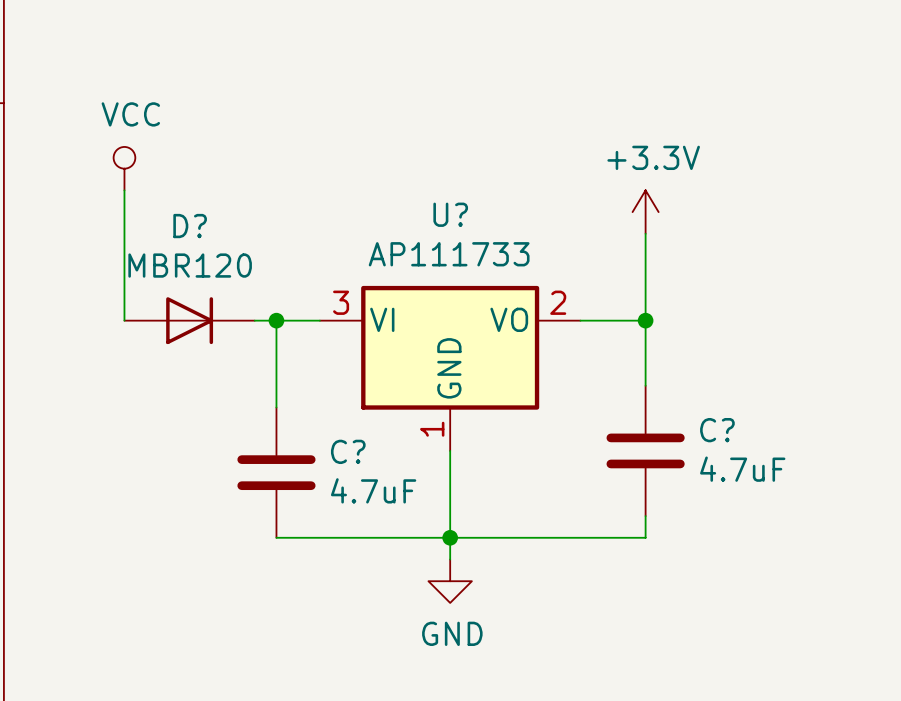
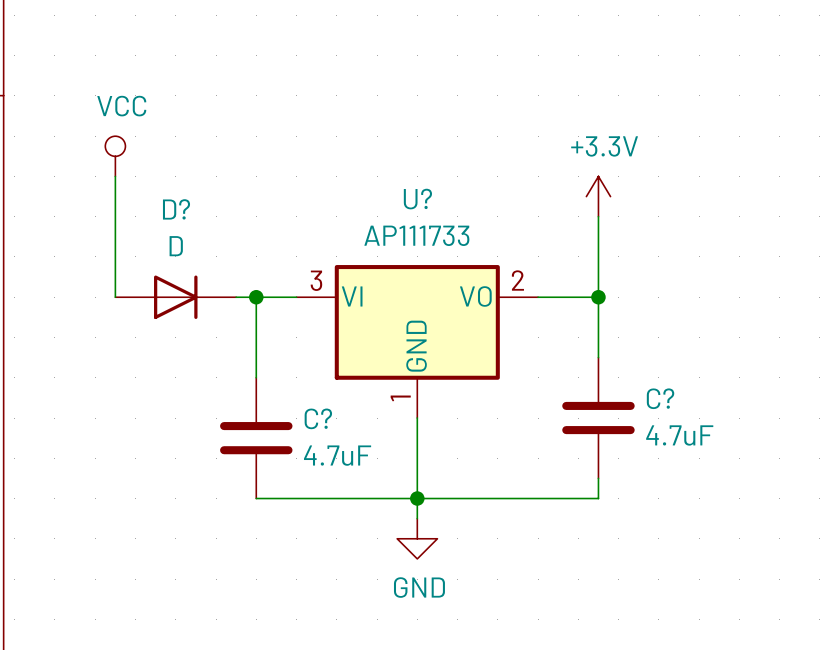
D? value: MBR120 (190, 265) -> D (176, 246)

